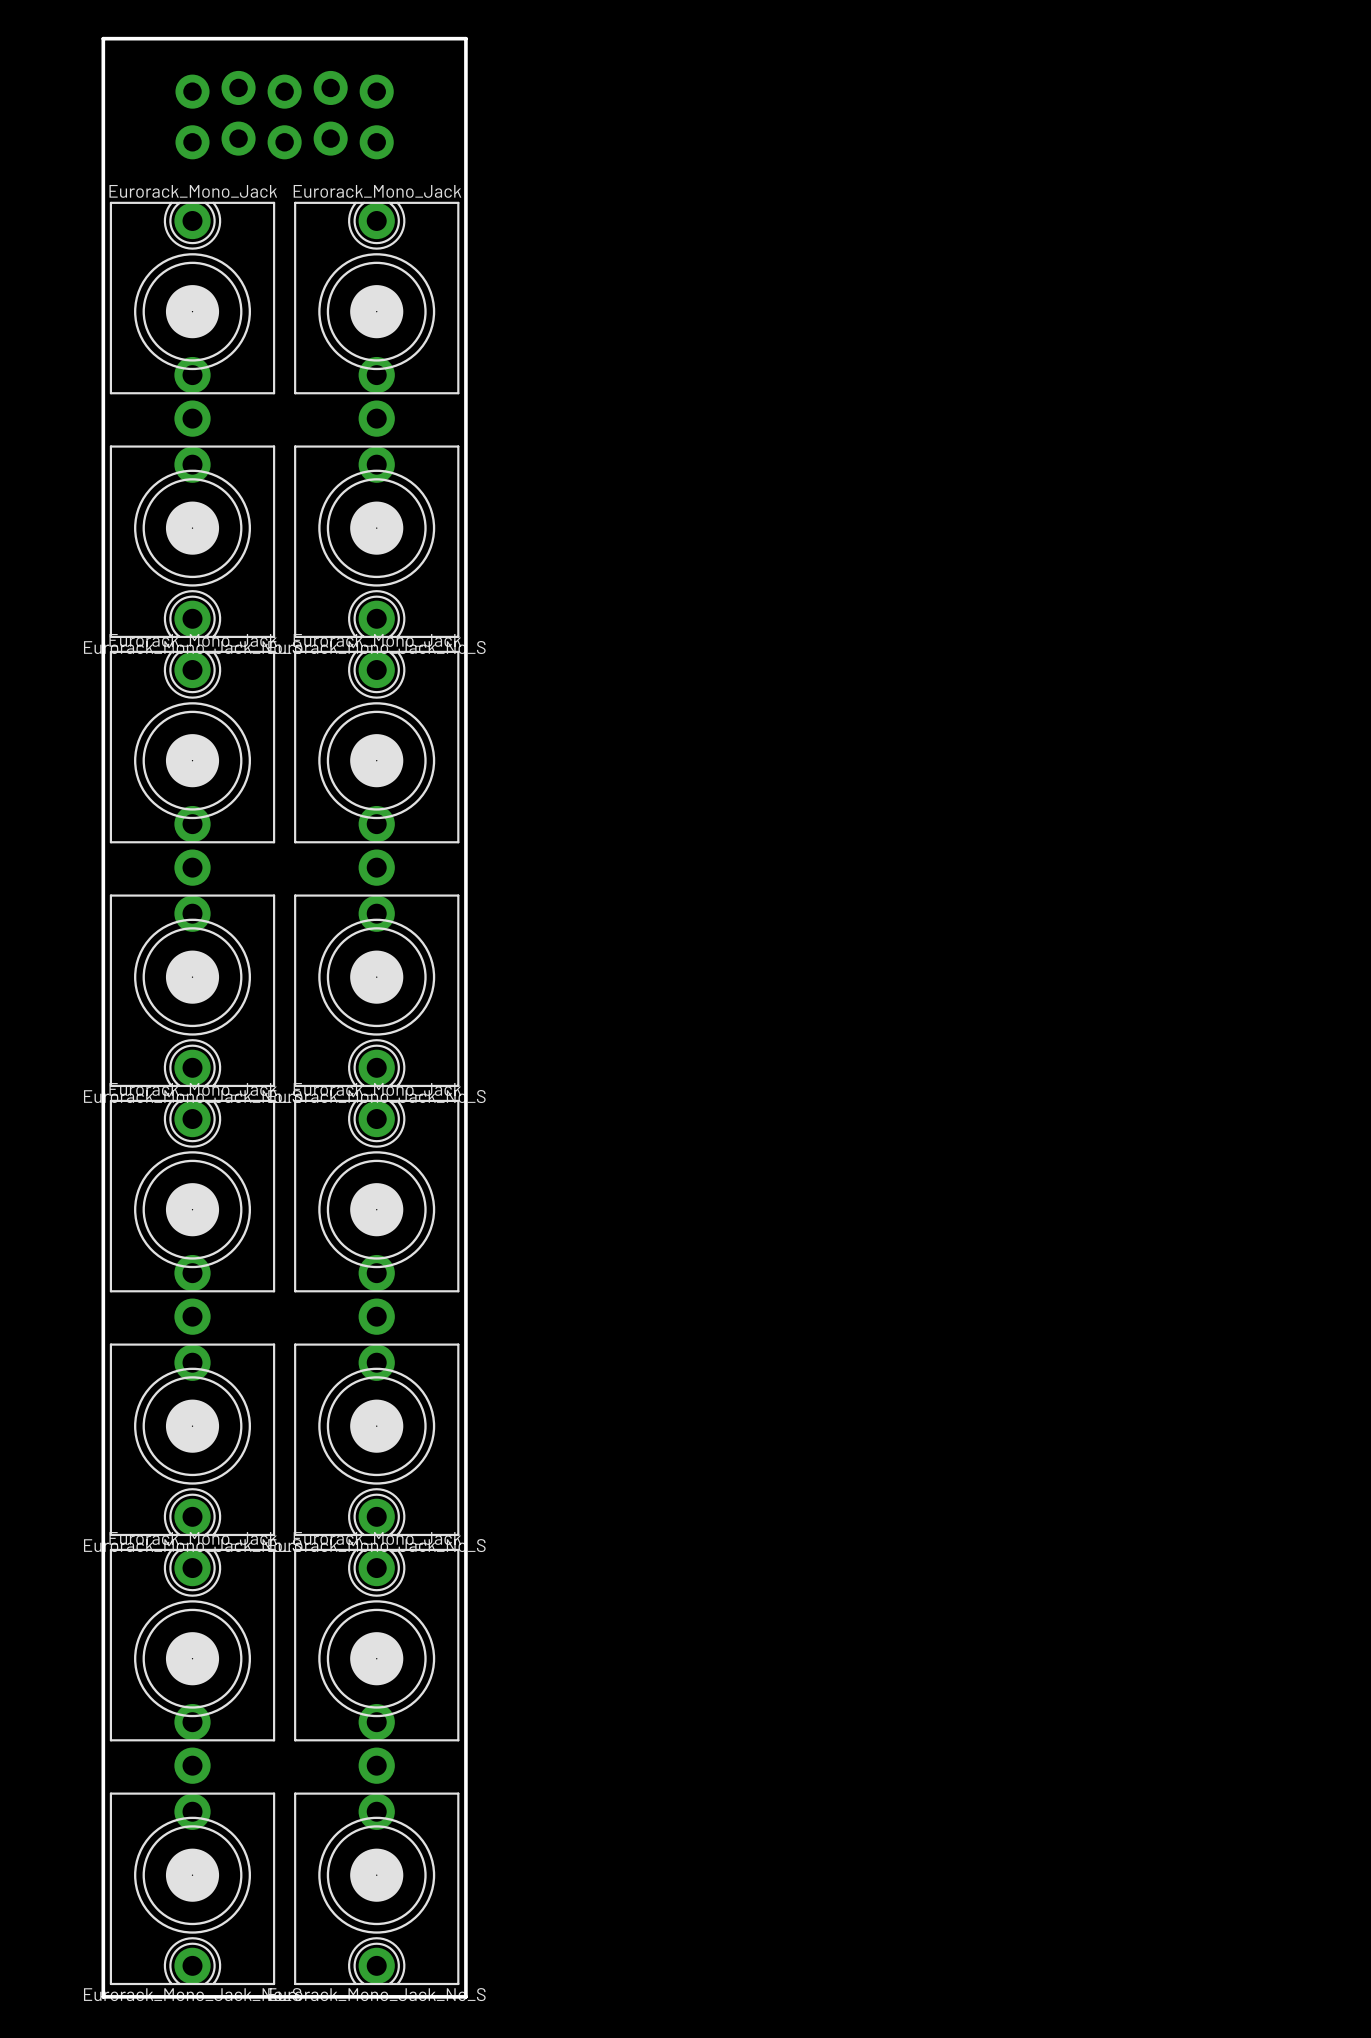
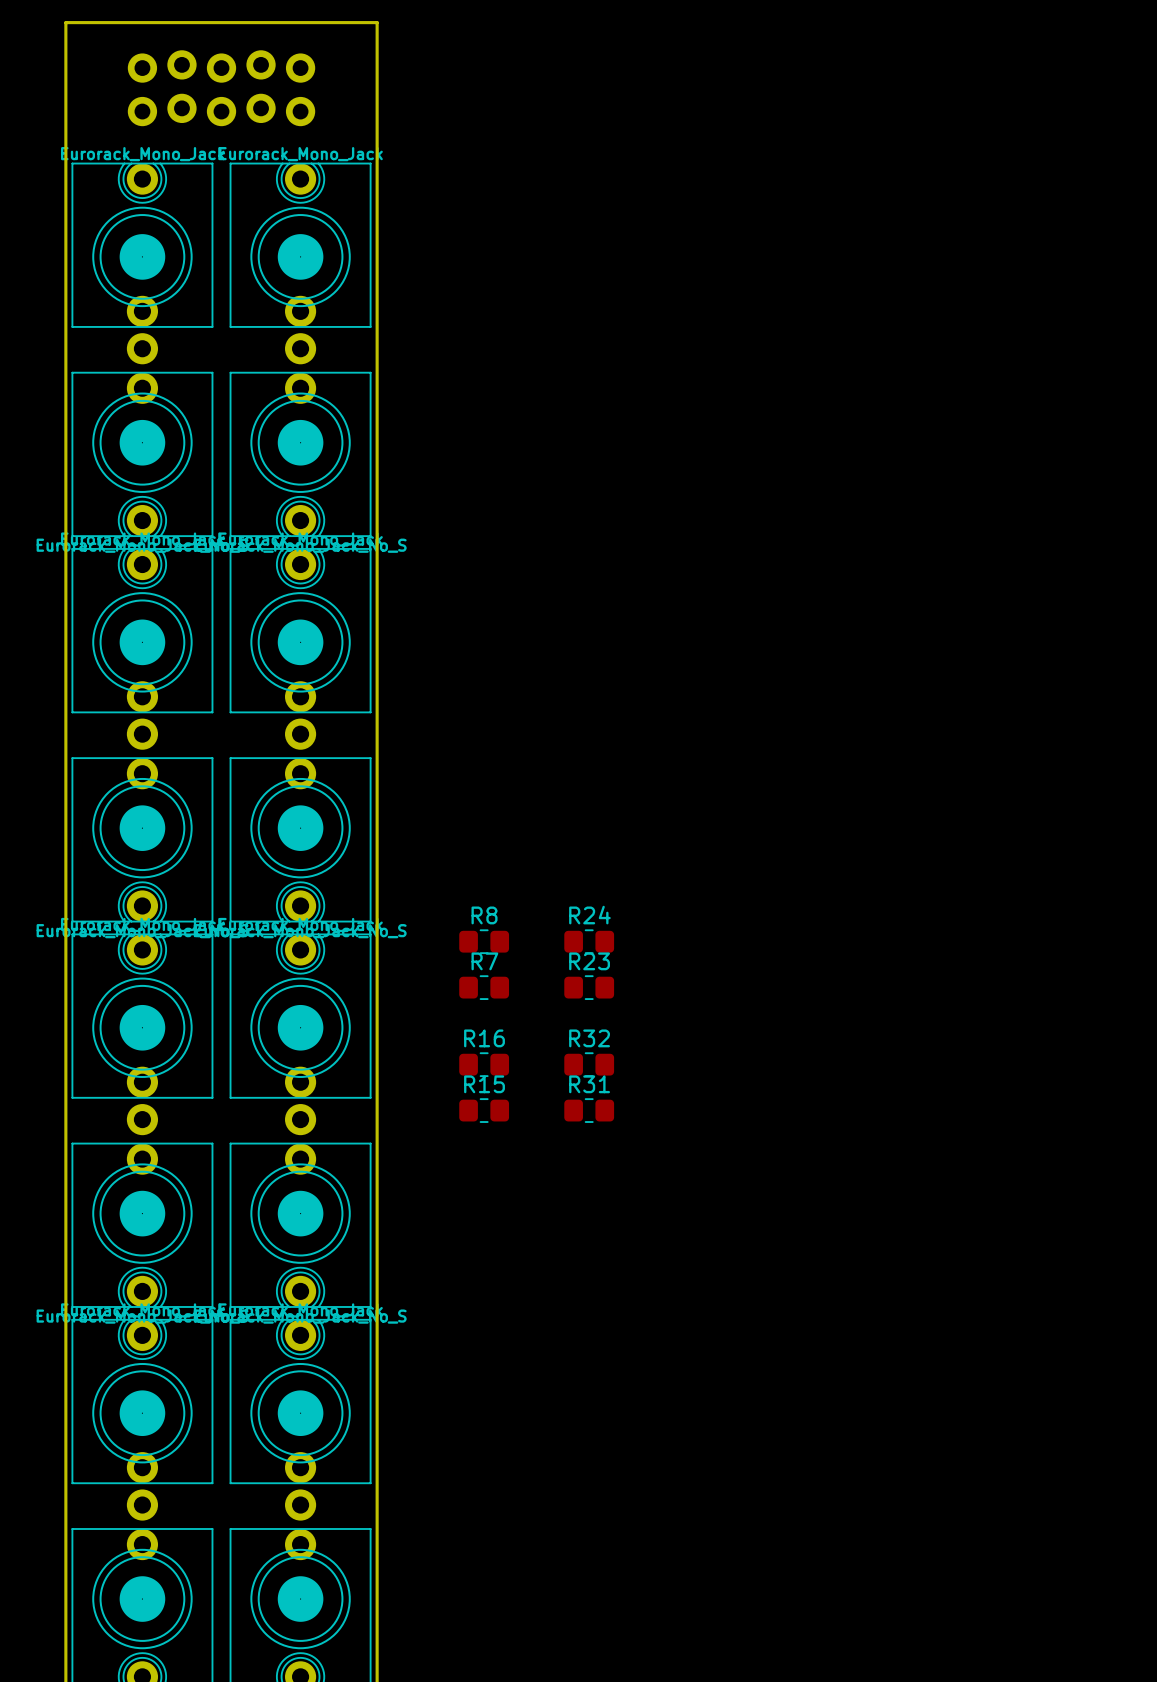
R8: none -> (484, 941)
R24: none -> (589, 941)
R7: none -> (484, 987)
R23: none -> (589, 987)
R16: none -> (484, 1064)
R32: none -> (589, 1064)
R15: none -> (484, 1110)
R31: none -> (589, 1110)

